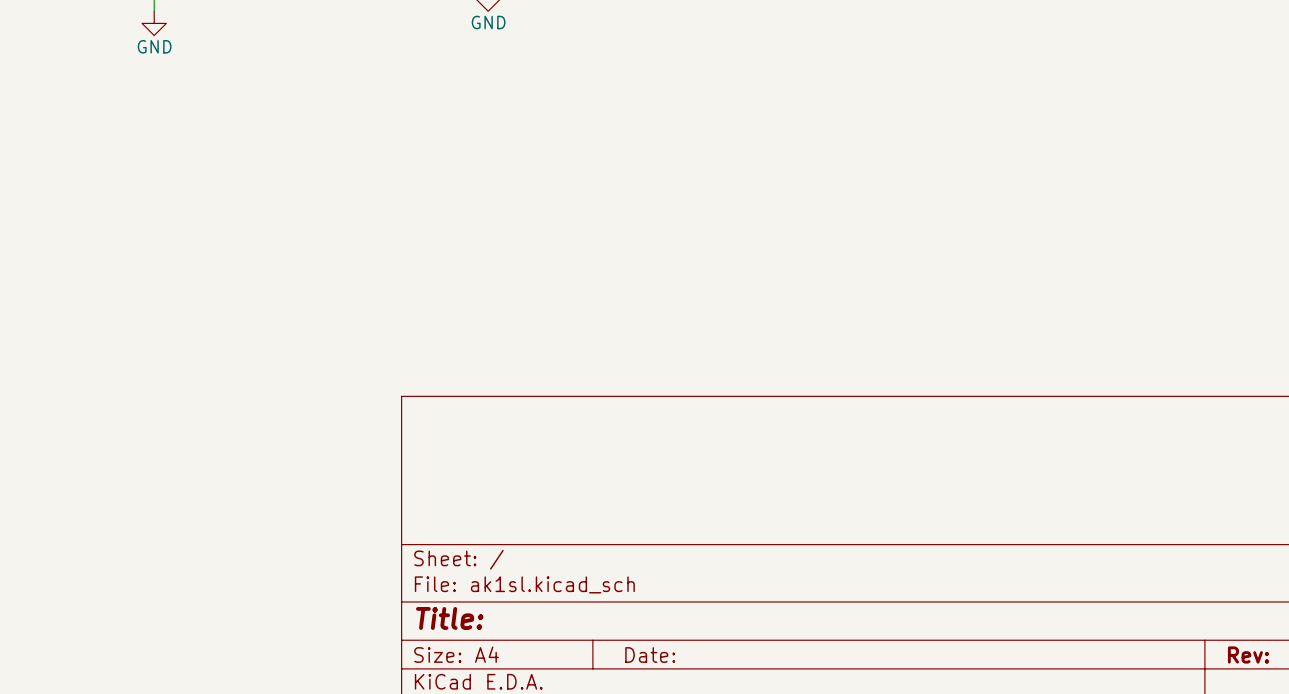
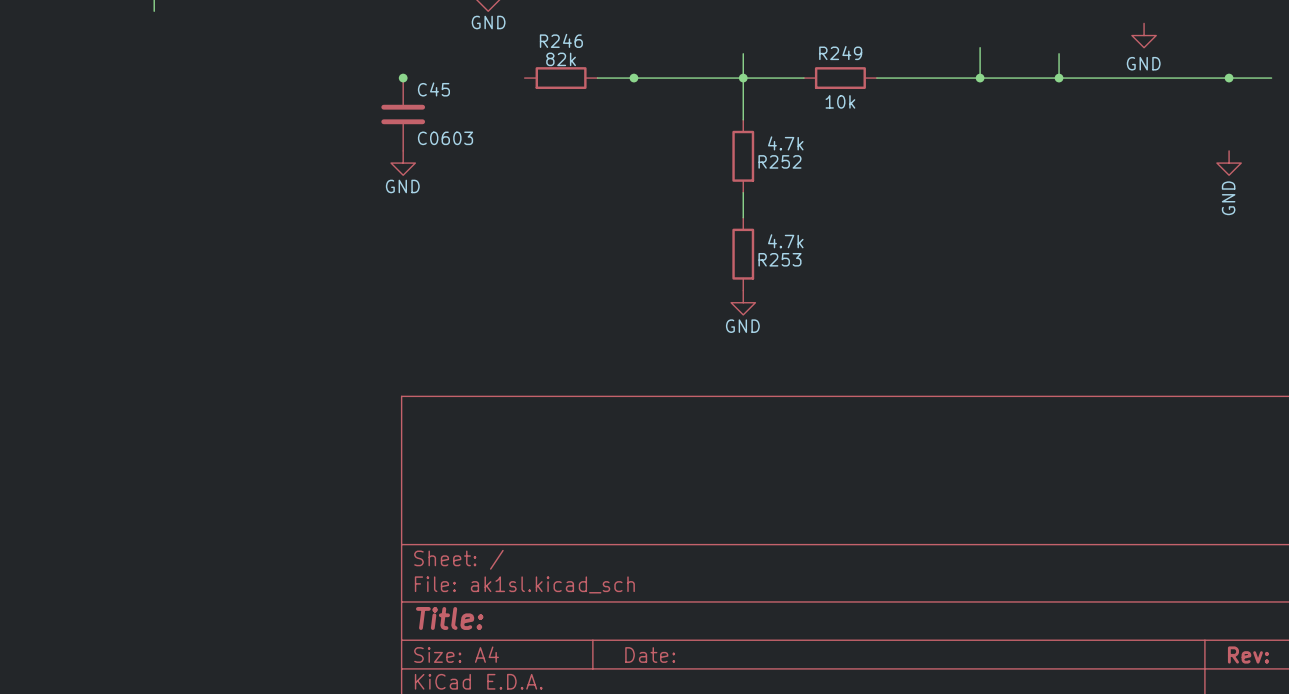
power symbol: GND (154, 23) -> none
power symbol: none -> GND (1144, 35)
wire: none -> (980, 47) (980, 78)
wire: none -> (743, 53) (743, 119)
wire: none -> (1059, 53) (1059, 78)
junction: none -> (403, 78)
R246: none -> 82k (561, 78)
wire: none -> (597, 78) (803, 78)
junction: none -> (633, 78)
junction: none -> (743, 78)
R249: none -> 10k (840, 78)
wire: none -> (876, 78) (1271, 78)
junction: none -> (980, 78)
junction: none -> (1059, 78)
junction: none -> (1229, 78)
C45: none -> C0603 (403, 114)
R252: none -> 4.7k (743, 156)
power symbol: none -> GND (403, 163)
power symbol: none -> GND (1229, 163)
wire: none -> (743, 192) (743, 217)
R253: none -> 4.7k (743, 254)
power symbol: none -> GND (743, 302)

